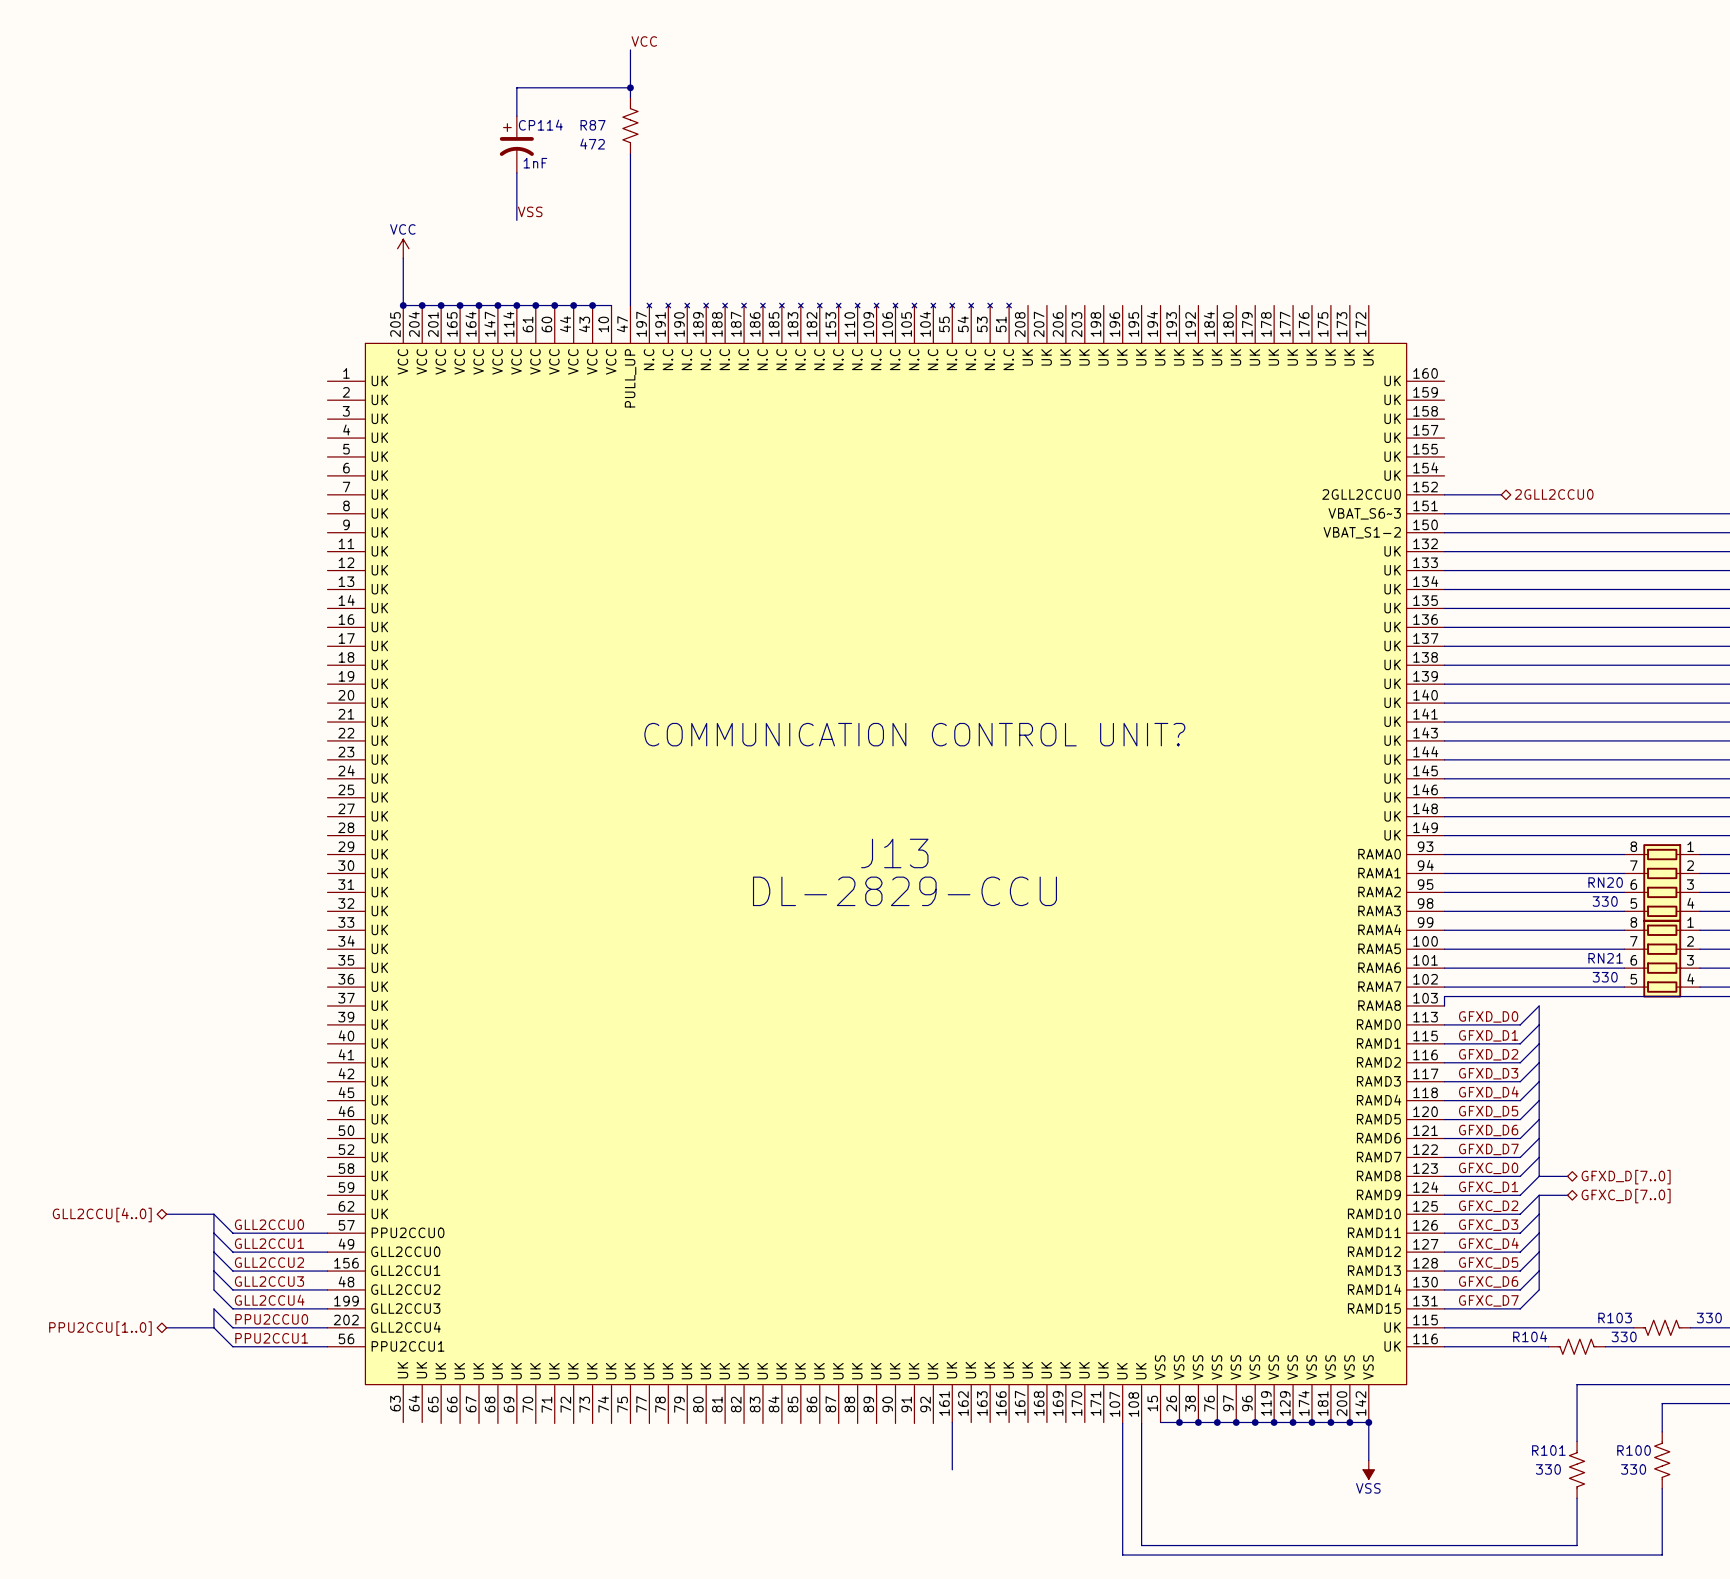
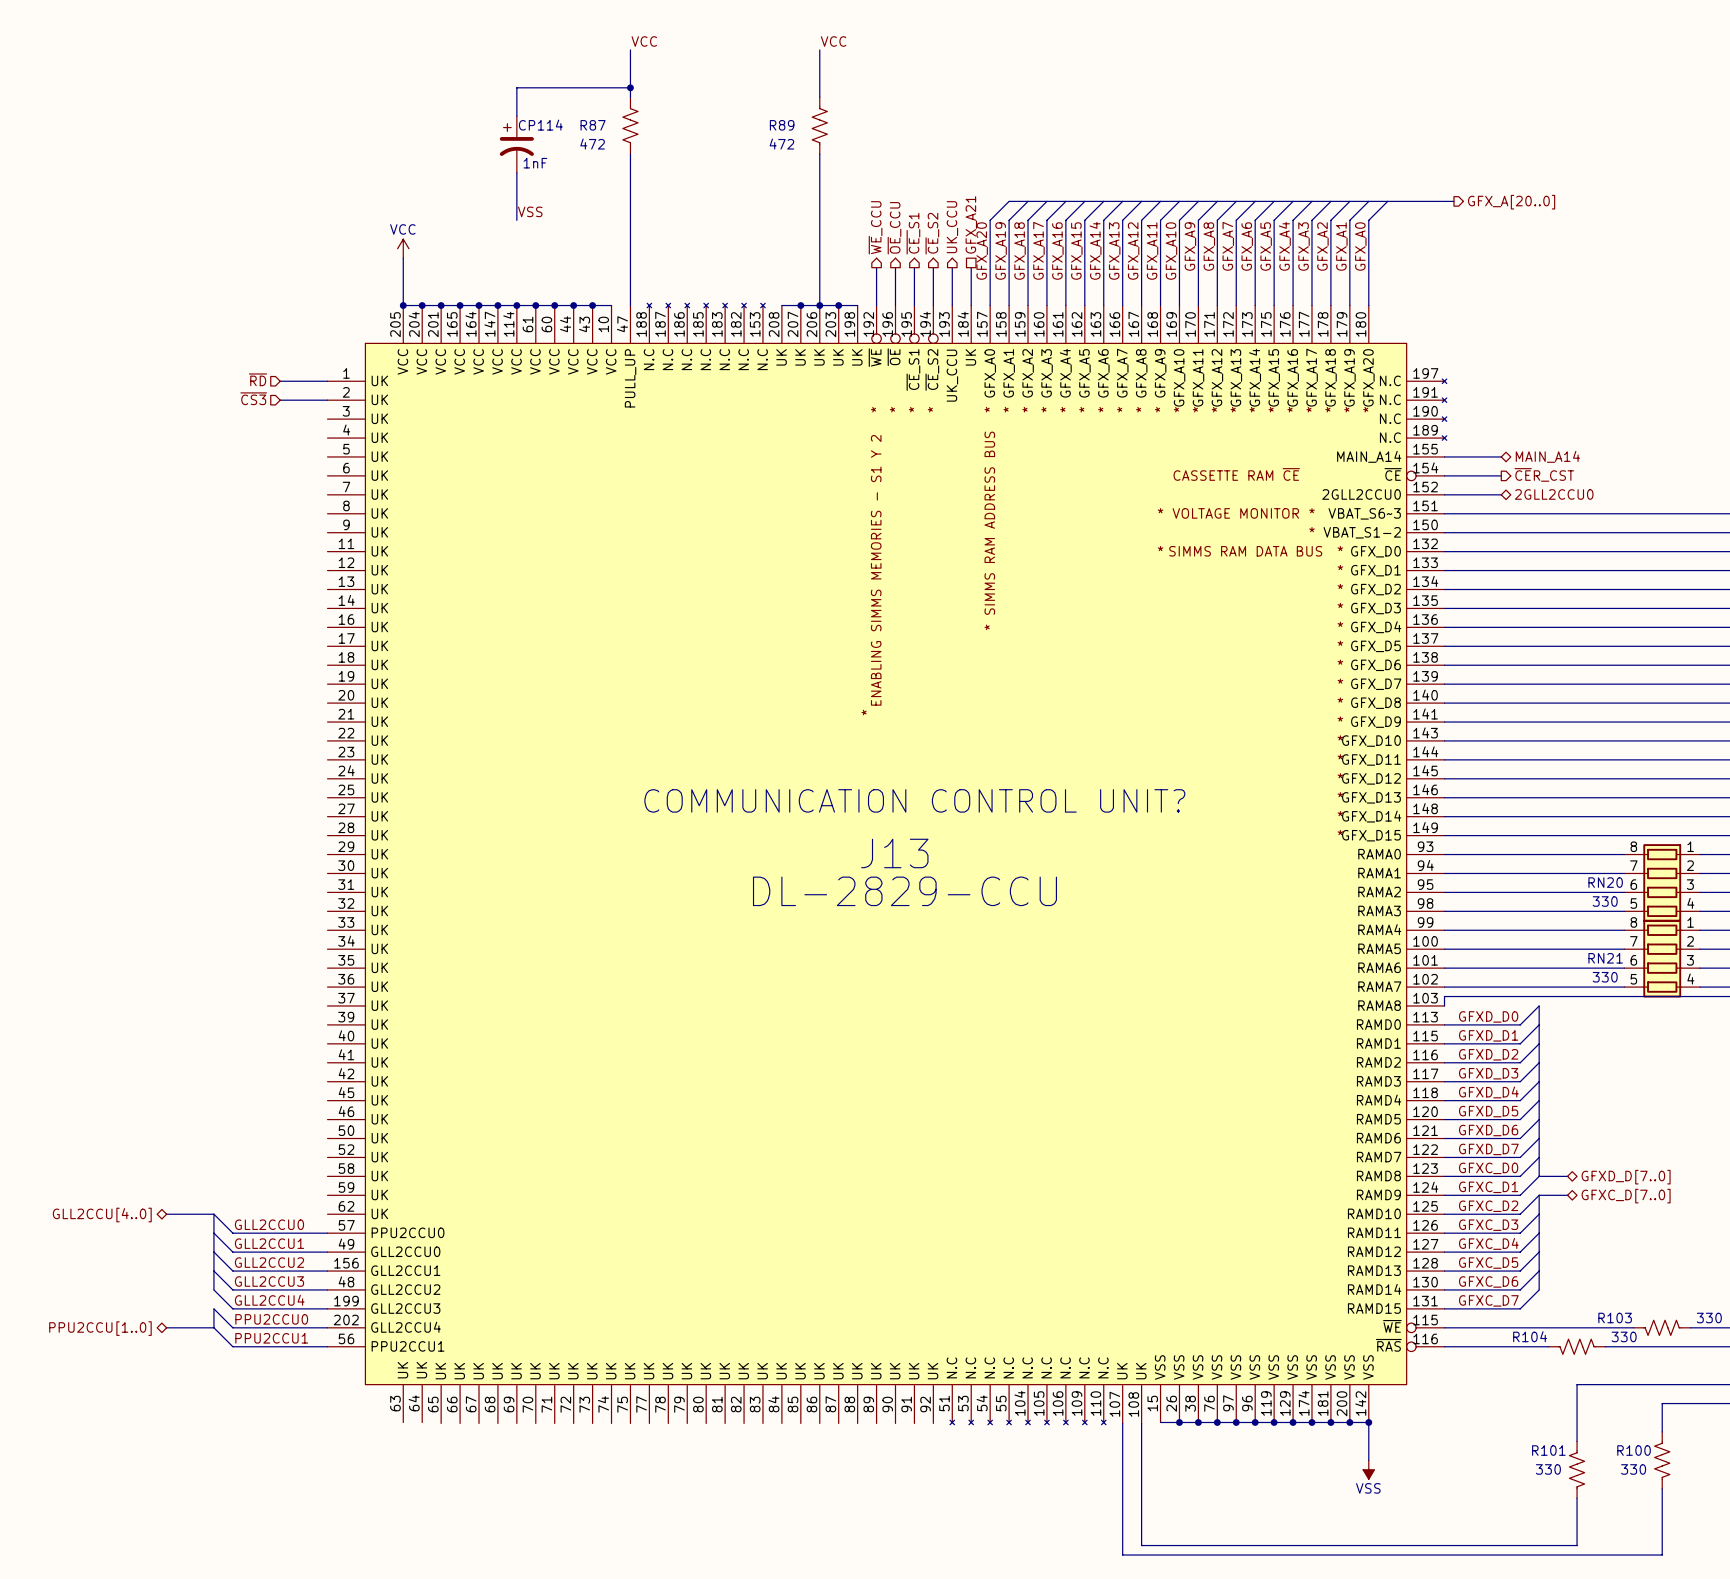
label: none -> VCC (833, 41)
wire: none -> (819, 49) (819, 97)
R89: none -> 472 (819, 125)
wire: none -> (819, 154) (819, 305)
wire: none -> (1009, 201) (990, 220) (990, 305)
bus: none -> (1009, 201) (1453, 201)
wire: none -> (1028, 201) (1009, 220) (1009, 305)
wire: none -> (1046, 201) (1028, 220) (1028, 305)
wire: none -> (1065, 201) (1046, 220) (1046, 305)
wire: none -> (1084, 201) (1065, 220) (1065, 305)
wire: none -> (1103, 201) (1084, 220) (1084, 305)
wire: none -> (1122, 201) (1103, 220) (1103, 305)
wire: none -> (1141, 201) (1122, 220) (1122, 305)
wire: none -> (1160, 201) (1141, 220) (1141, 305)
wire: none -> (1179, 201) (1160, 220) (1160, 305)
wire: none -> (1198, 201) (1179, 220) (1179, 305)
wire: none -> (1217, 201) (1198, 220) (1198, 305)
wire: none -> (1236, 201) (1217, 220) (1217, 305)
wire: none -> (1255, 201) (1236, 220) (1236, 305)
wire: none -> (1274, 201) (1255, 220) (1255, 305)
wire: none -> (1293, 201) (1274, 220) (1274, 305)
wire: none -> (1311, 201) (1293, 220) (1293, 305)
wire: none -> (1330, 201) (1311, 220) (1311, 305)
wire: none -> (1349, 201) (1330, 220) (1330, 305)
wire: none -> (1368, 201) (1349, 220) (1349, 305)
wire: none -> (1387, 201) (1368, 220) (1368, 305)
hierarchical label: none -> GFX_A[20..0] (1511, 202)
hierarchical label: none -> GFX_A21 (971, 224)
hierarchical label: none -> ~{WE}_CCU (875, 227)
hierarchical label: none -> UK_CCU (952, 227)
hierarchical label: none -> ~{OE}_CCU (894, 228)
hierarchical label: none -> ~{CE_}S1 (913, 233)
hierarchical label: none -> ~{CE}_S2 (932, 233)
label: none -> GFX_A9 (1190, 246)
label: none -> GFX_A8 (1209, 246)
label: none -> GFX_A7 (1228, 246)
label: none -> GFX_A6 (1247, 246)
label: none -> GFX_A5 (1266, 246)
label: none -> GFX_A4 (1284, 246)
label: none -> GFX_A3 (1303, 246)
label: none -> GFX_A2 (1322, 246)
label: none -> GFX_A1 (1341, 246)
label: none -> GFX_A0 (1360, 246)
label: none -> GFX_A17 (1038, 250)
label: none -> GFX_A14 (1095, 250)
label: none -> GFX_A20 (982, 251)
label: none -> GFX_A19 (1001, 251)
label: none -> GFX_A18 (1020, 251)
label: none -> GFX_A16 (1057, 251)
label: none -> GFX_A15 (1076, 251)
label: none -> GFX_A13 (1114, 251)
label: none -> GFX_A12 (1133, 251)
label: none -> GFX_A11 (1152, 251)
label: none -> GFX_A10 (1171, 251)
wire: none -> (876, 267) (876, 305)
wire: none -> (895, 267) (895, 305)
wire: none -> (914, 267) (914, 305)
wire: none -> (933, 267) (933, 305)
wire: none -> (952, 267) (952, 305)
wire: none -> (971, 267) (971, 305)
J13 symbol: [327, 303, 1445, 1424] -> [327, 303, 1447, 1425]
wire: none -> (781, 305) (857, 305)
junction: none -> (800, 305)
junction: none -> (819, 305)
junction: none -> (838, 305)
hierarchical label: none -> ~{RD} (257, 379)
wire: none -> (280, 381) (327, 381)
hierarchical label: none -> ~{CS3} (253, 398)
wire: none -> (280, 400) (327, 400)
wire: none -> (1444, 456) (1501, 456)
hierarchical label: none -> MAIN_A14 (1547, 456)
hierarchical label: none -> ~{CE}R_CST (1544, 474)
wire: none -> (1444, 475) (1501, 475)
text position: COMMUNICATION CONTROL UNIT? (914, 734) -> COMMUNICATION CONTROL UNIT? (914, 800)
wire: (952, 1422) (952, 1469) -> none

